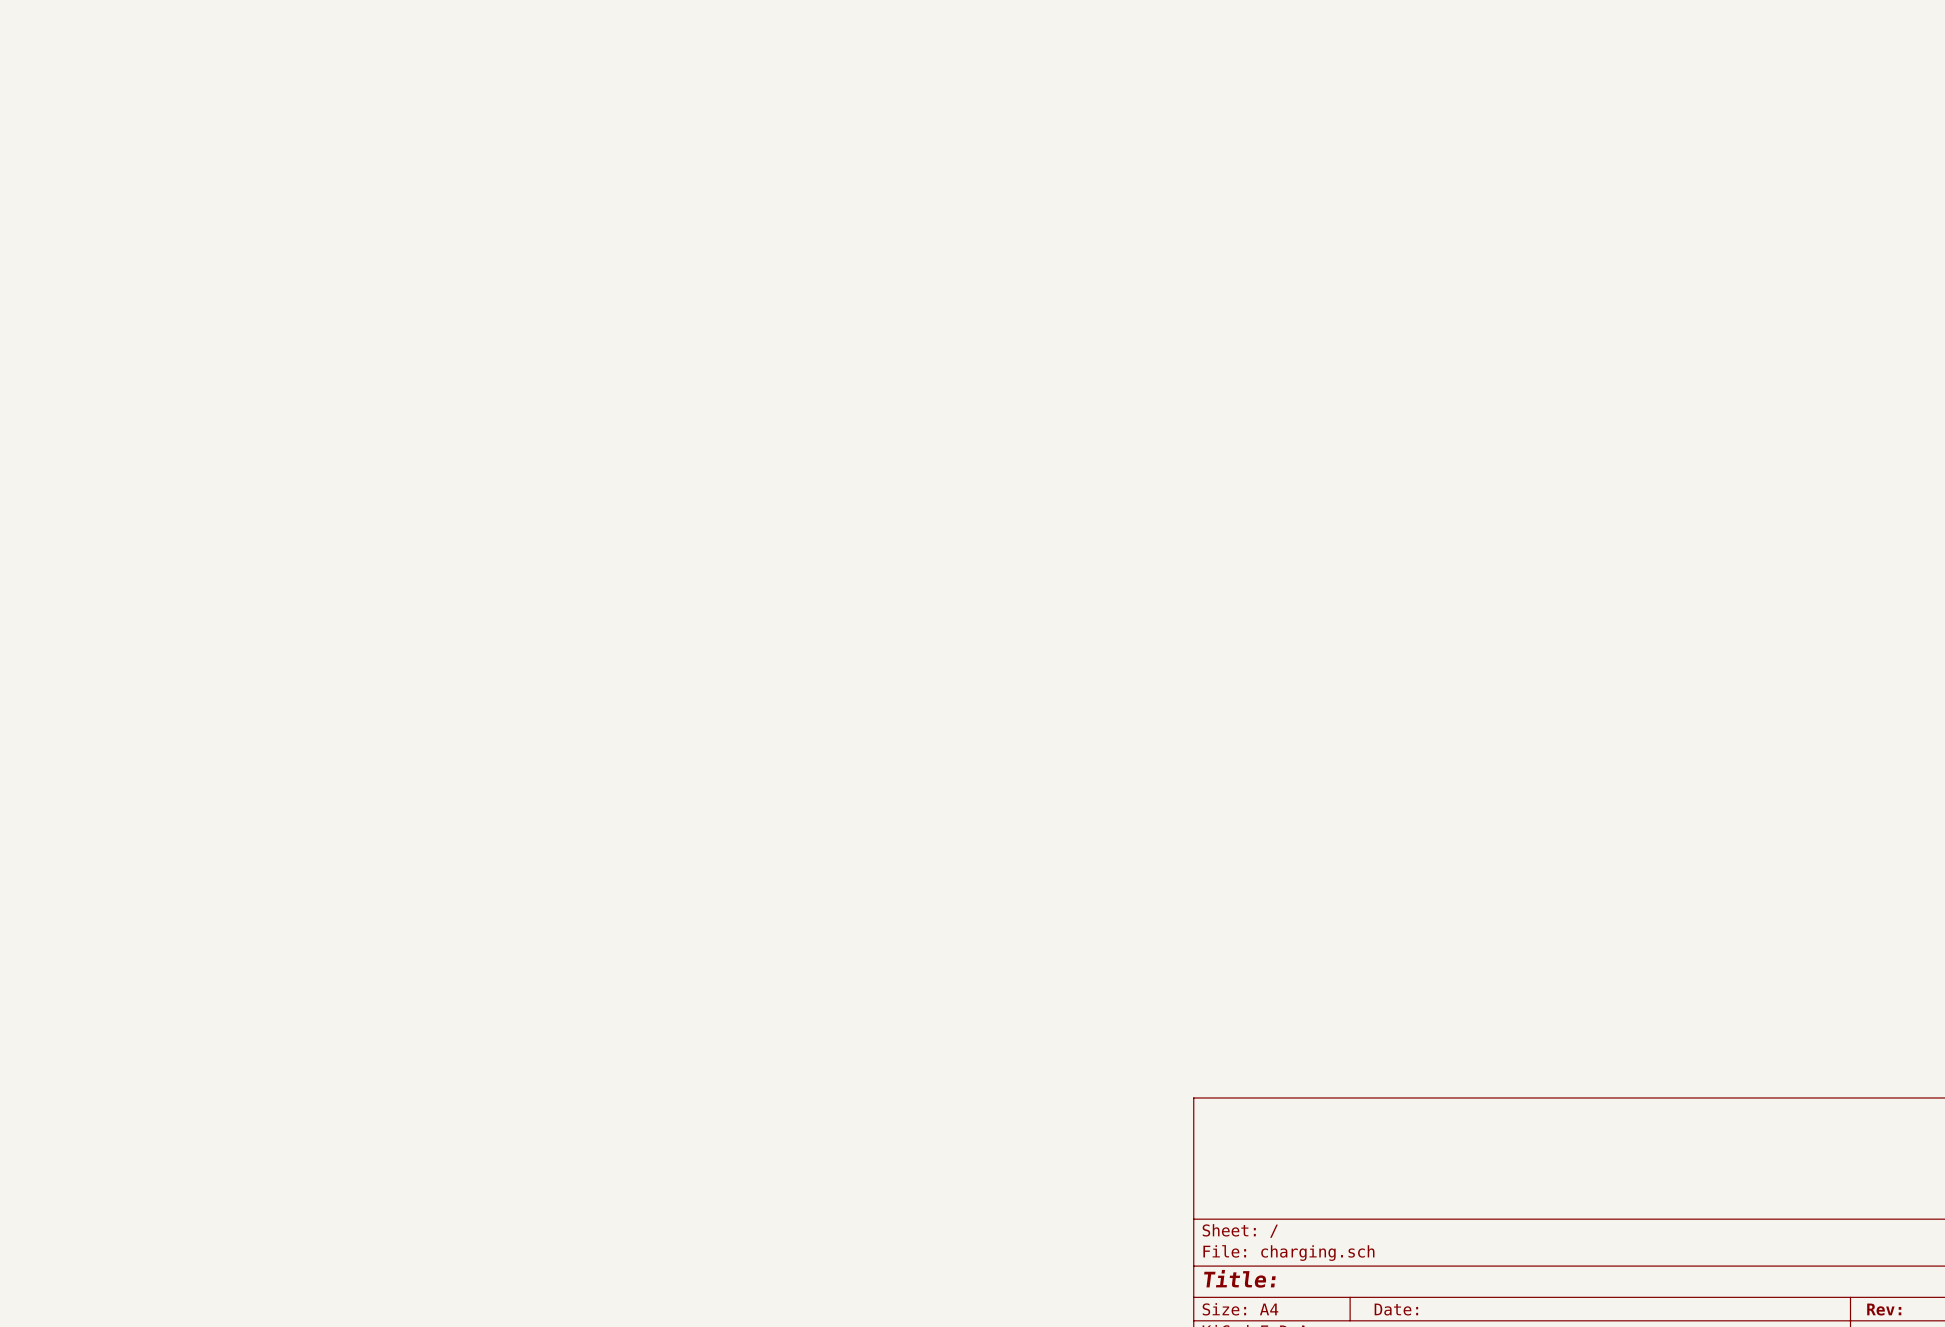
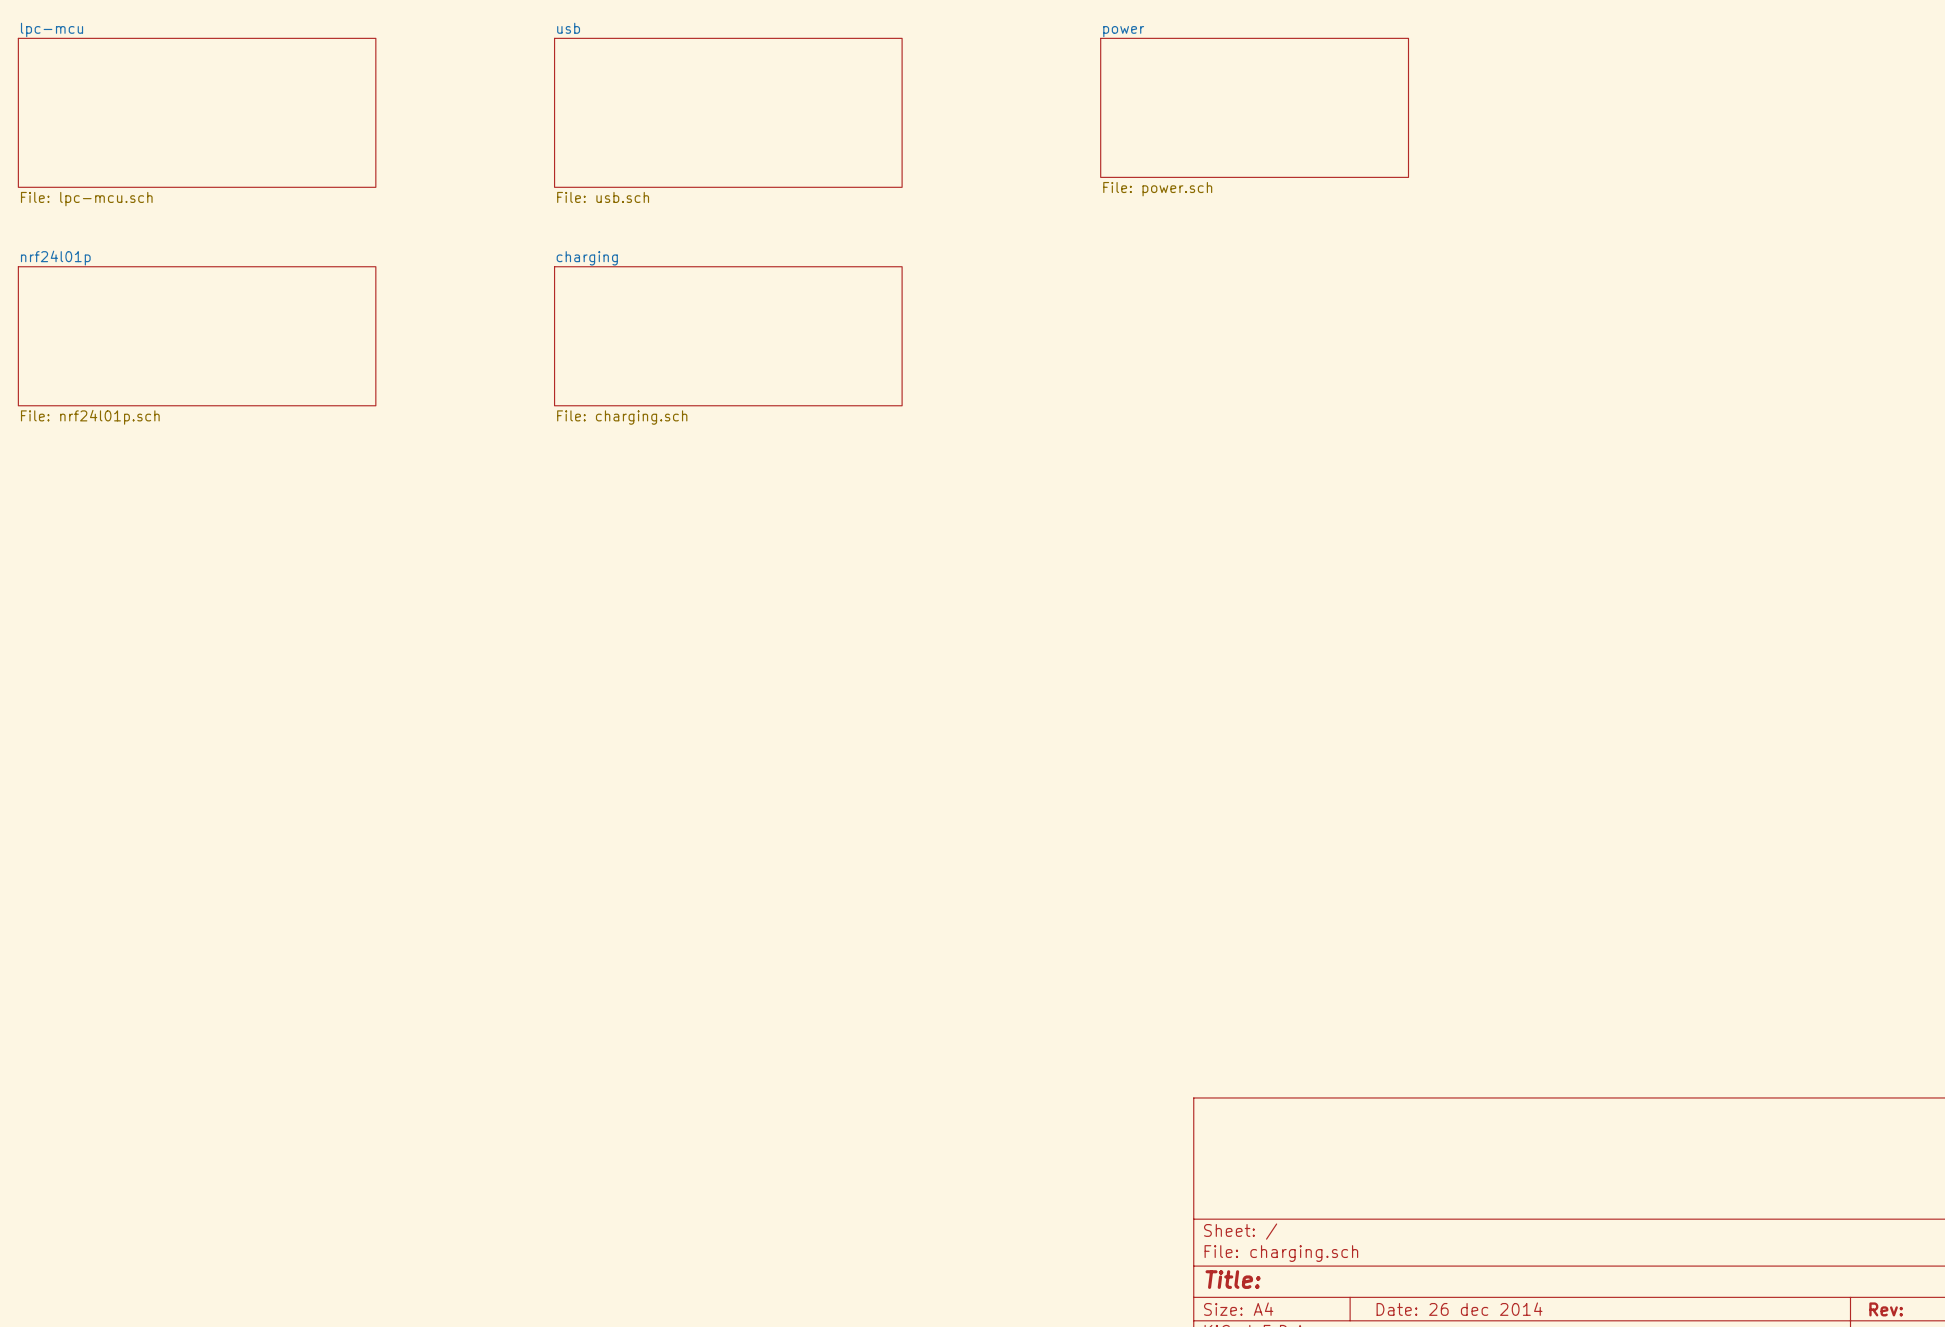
sheet power: none -> File: power.sch (1254, 107)
sheet lpc-mcu: none -> File: lpc-mcu.sch (197, 112)
sheet usb: none -> File: usb.sch (728, 112)
sheet nrf24l01p: none -> File: nrf24l01p.sch (197, 336)
sheet charging: none -> File: charging.sch (728, 336)
title block: Date: (1396, 1309) -> Date: 26 dec 2014 (1459, 1309)

